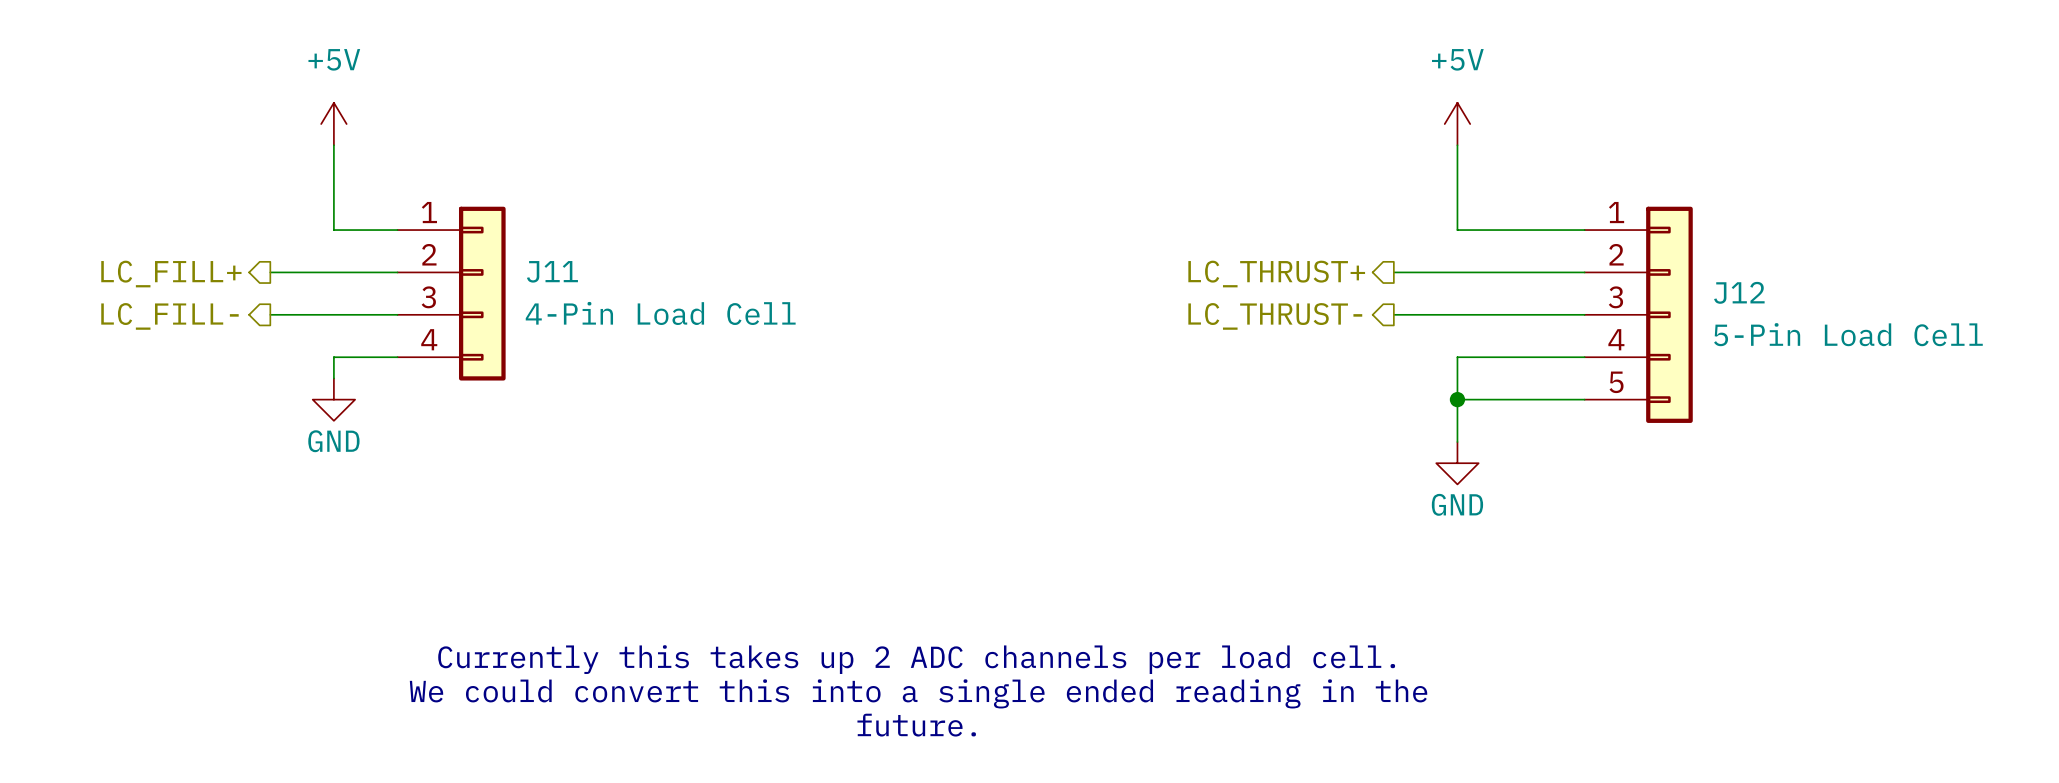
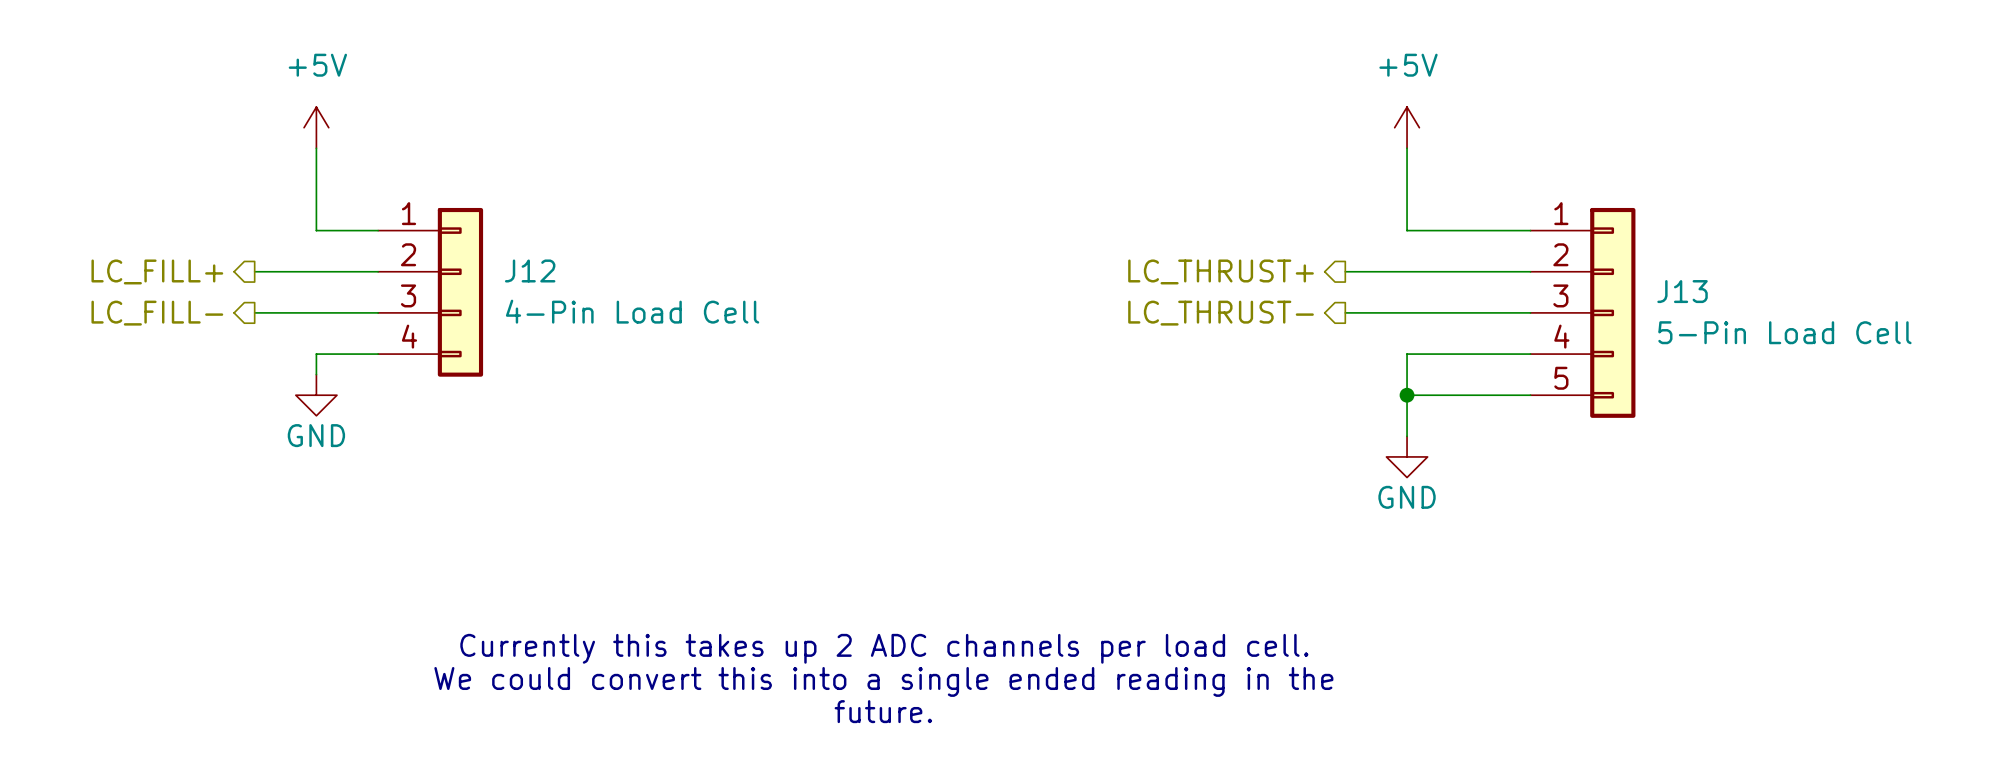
J11 name: J11 (552, 271) -> J12 (530, 270)
J12 name: J12 (1739, 292) -> J13 (1682, 291)

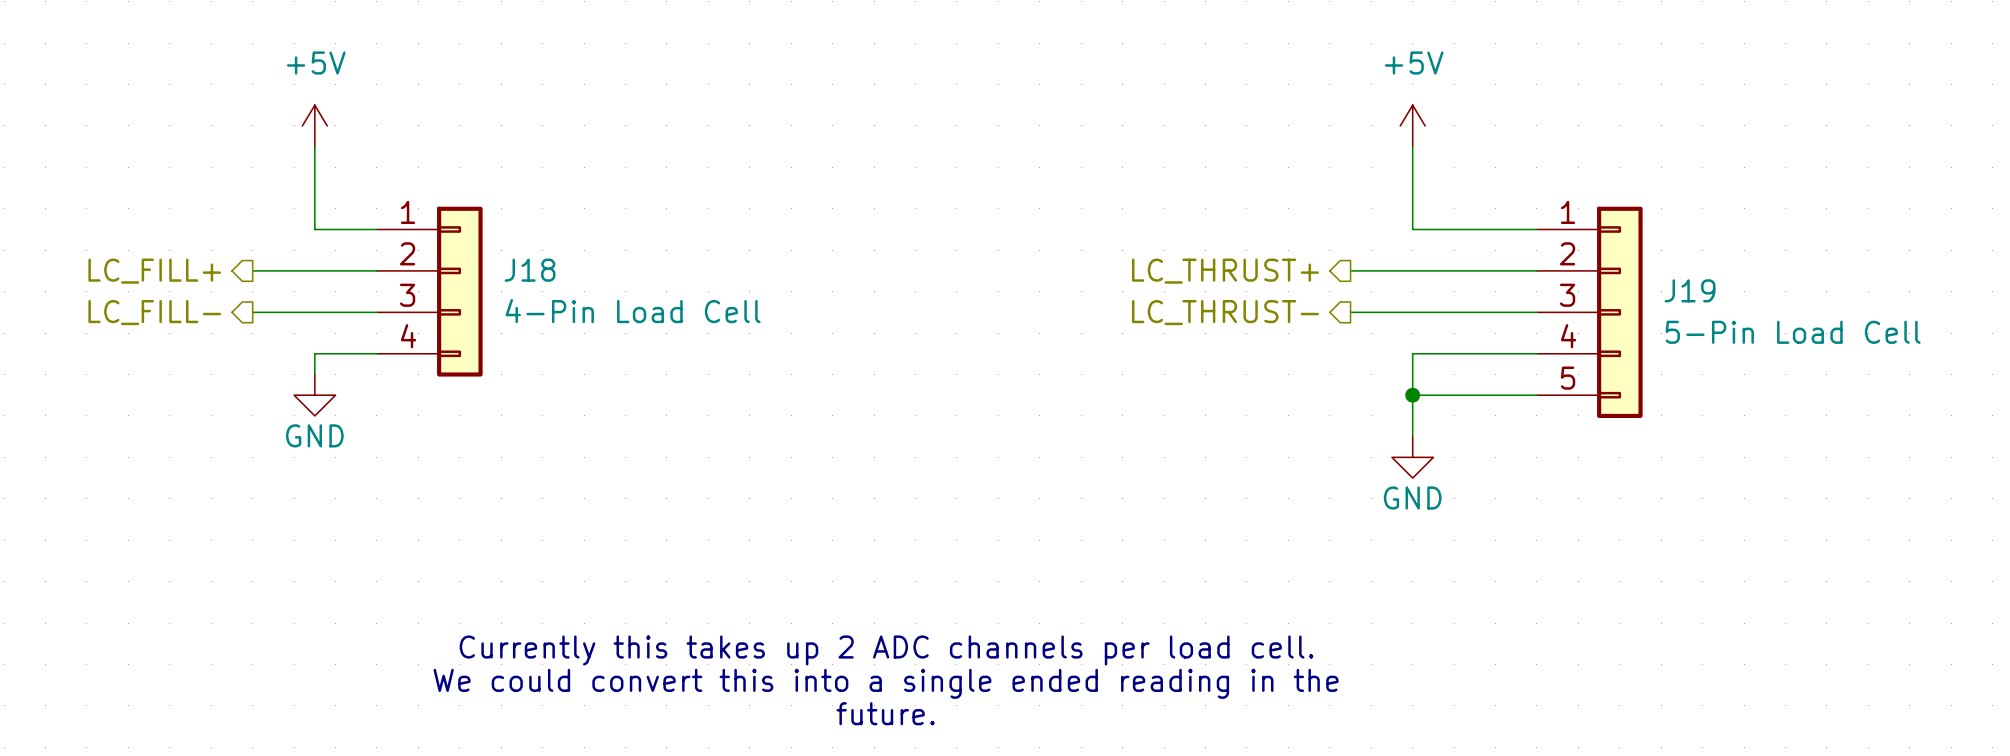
J12 name: J12 (530, 270) -> J18 (530, 270)
J13 name: J13 (1682, 291) -> J19 (1690, 290)

